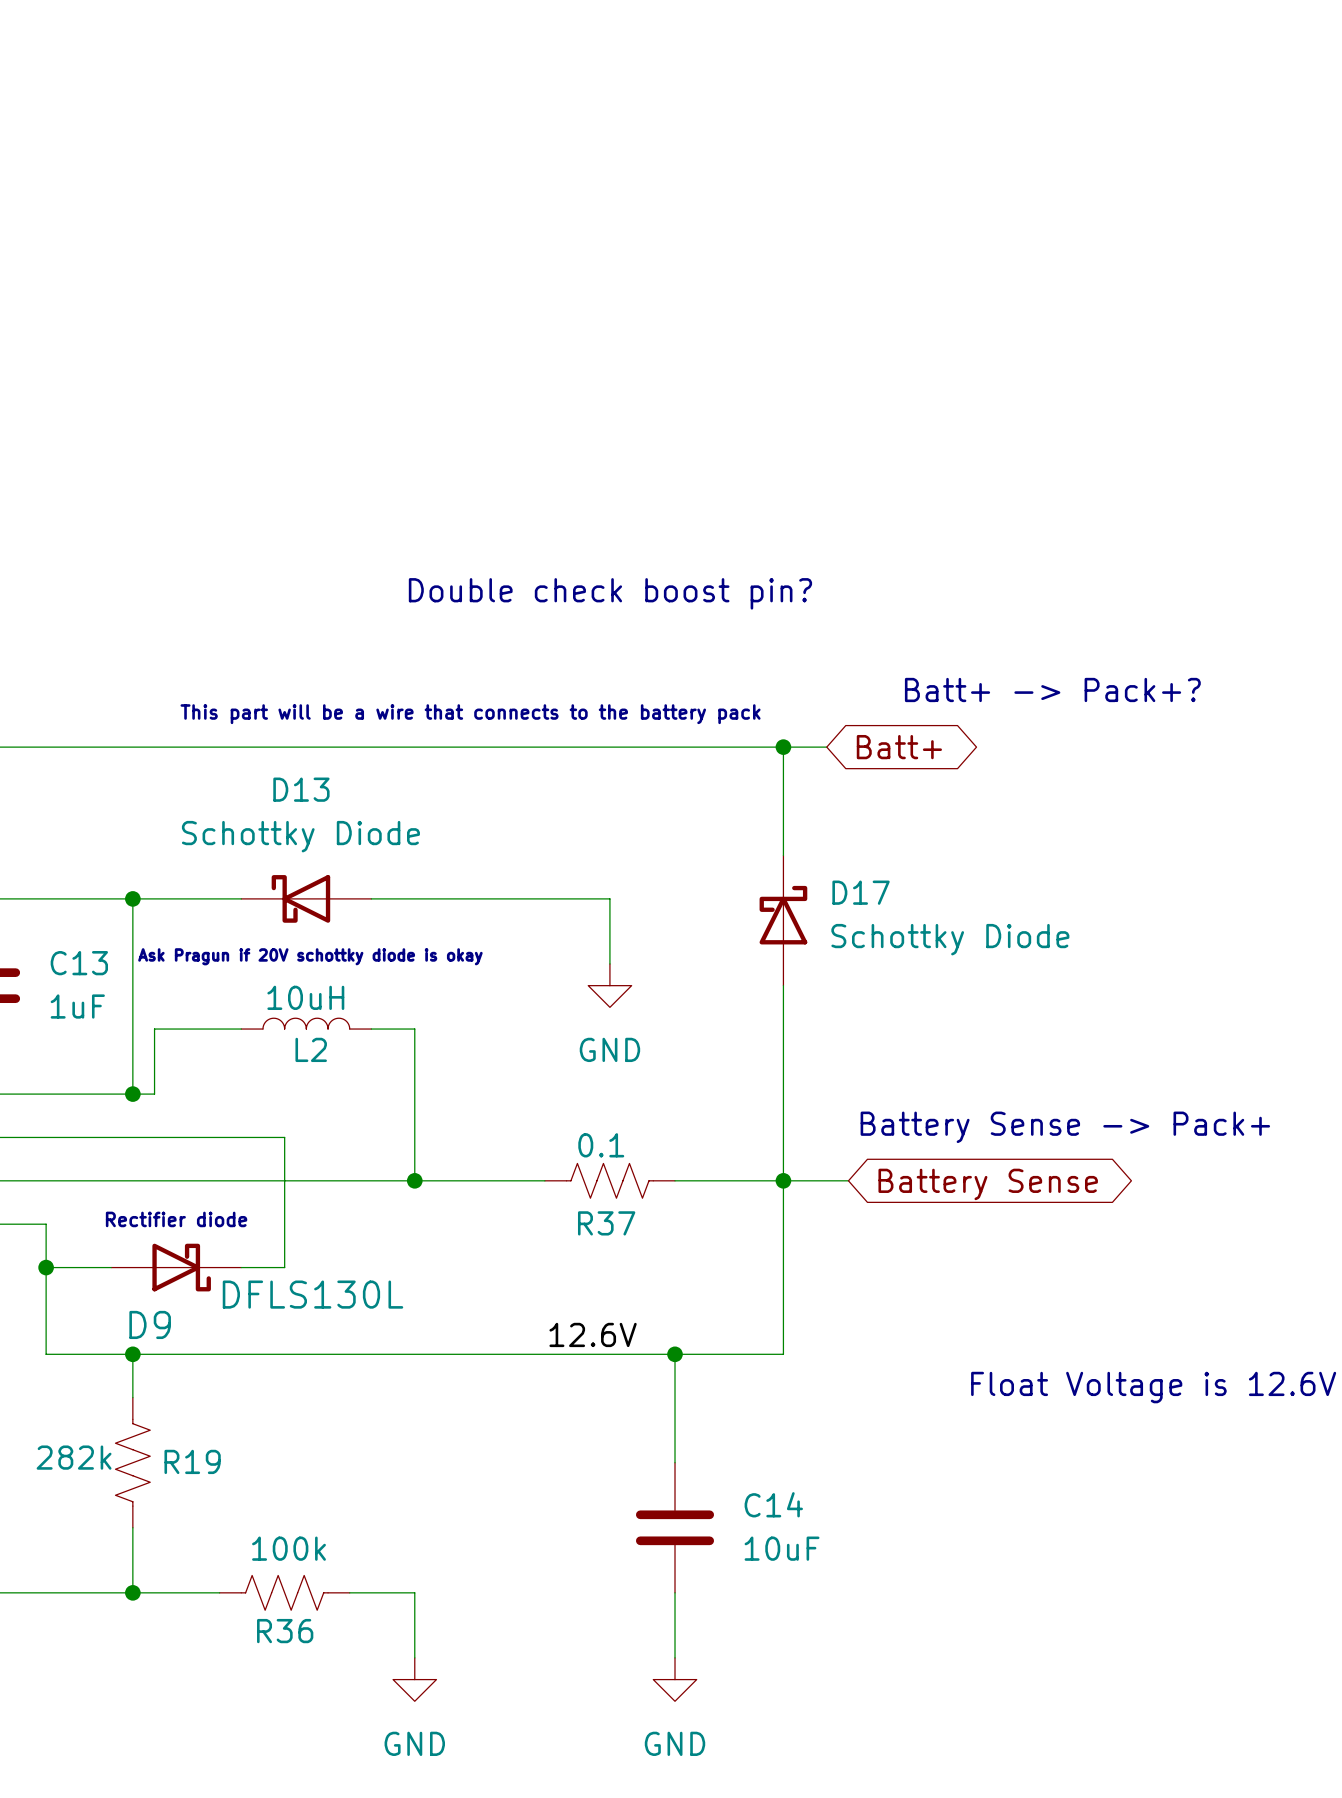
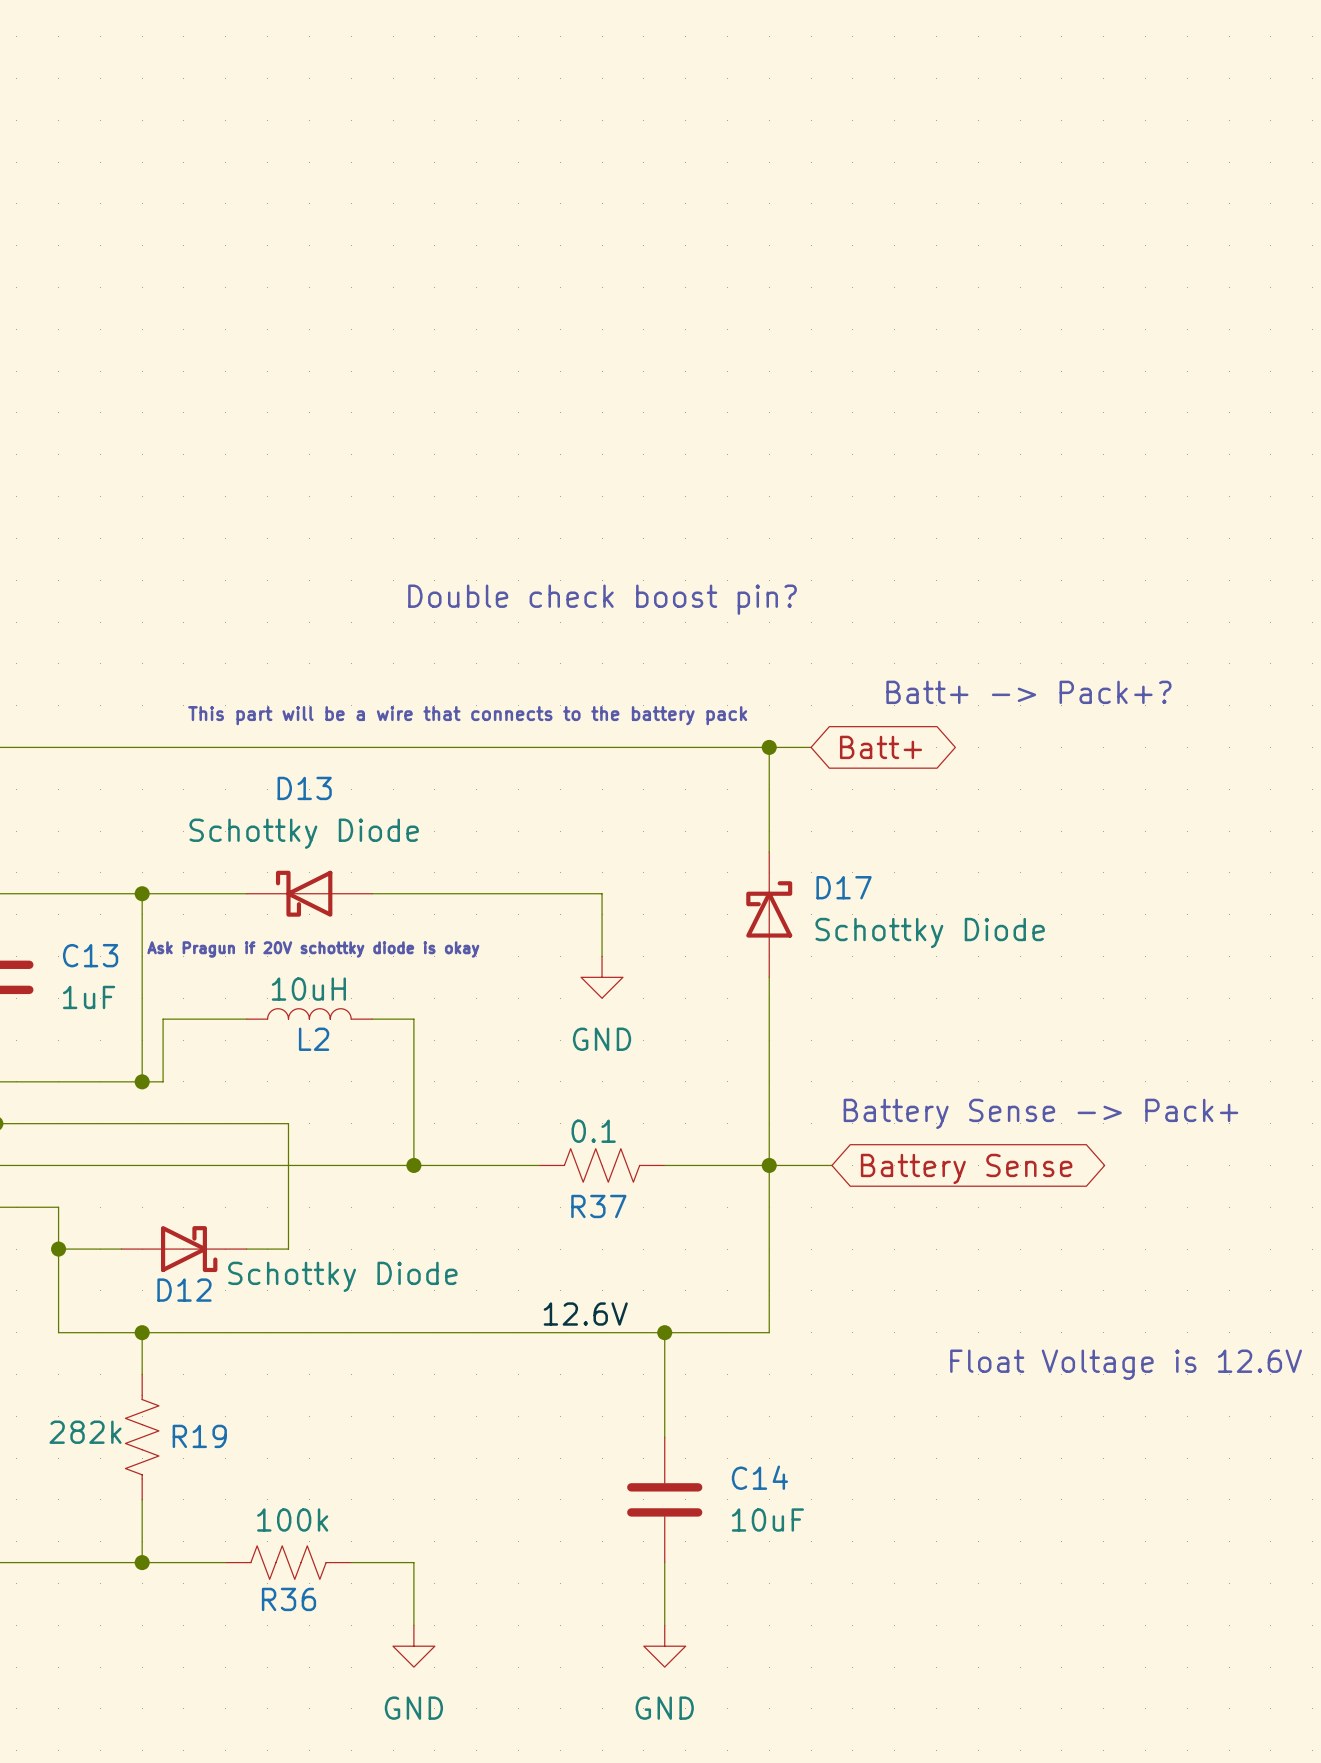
text: Rectifier diode (176, 1219) -> none
D9 value: DFLS130L (313, 1294) -> Schottky Diode (342, 1276)
D9 name: D9 (150, 1324) -> D12 (184, 1290)

